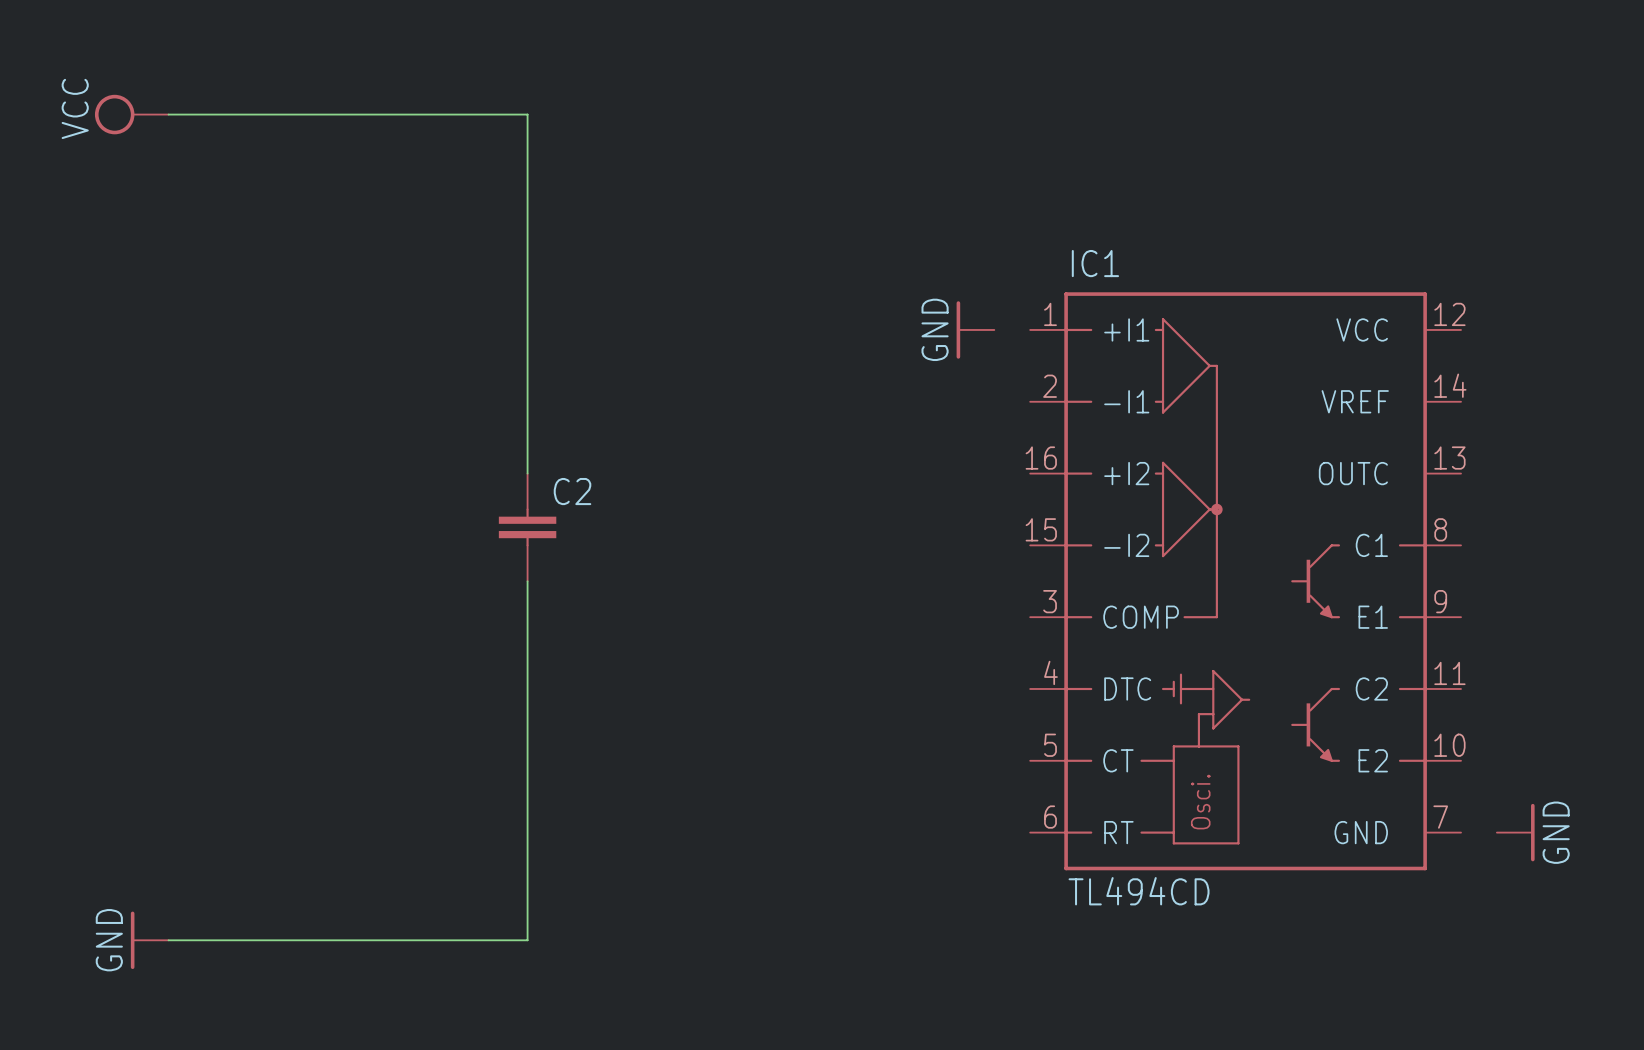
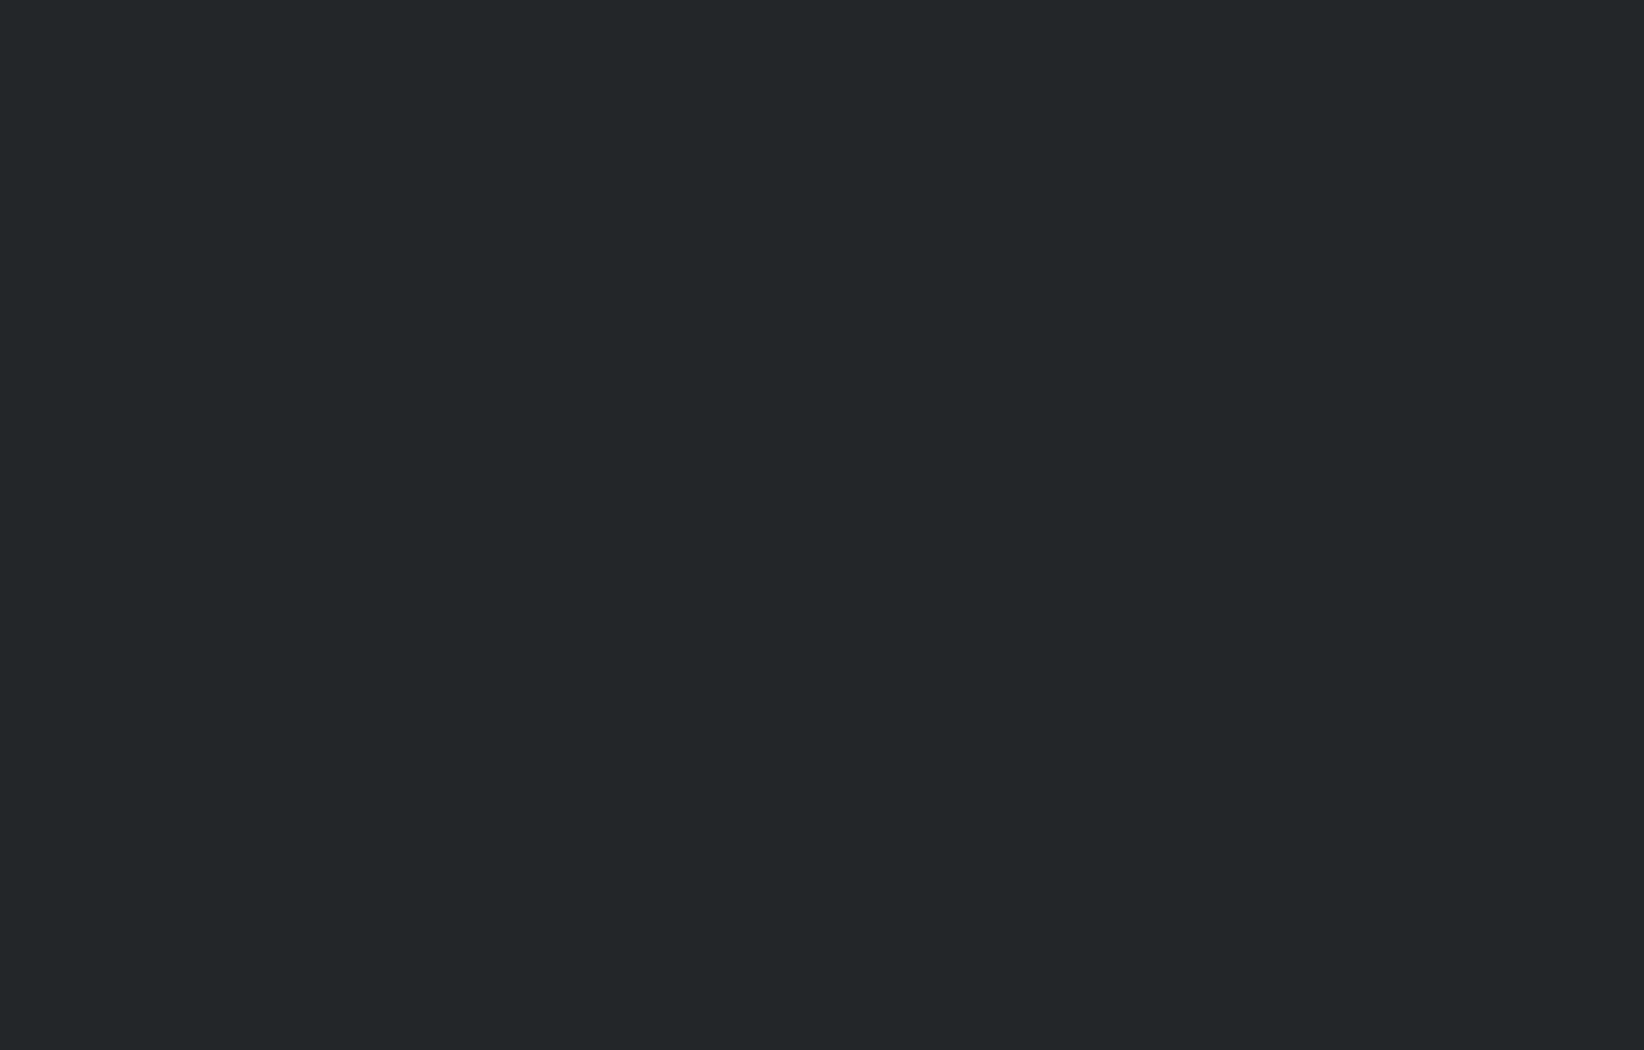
power symbol: VCC (131, 114) -> none
wire: (168, 114) (527, 114) (527, 473) -> none
power symbol: GND (975, 329) -> none
C2: (527, 527) -> none
wire: (527, 581) (527, 940) (168, 940) -> none
IC1: TL494CD (1245, 581) -> none
power symbol: GND (1515, 832) -> none
power symbol: GND (149, 940) -> none

